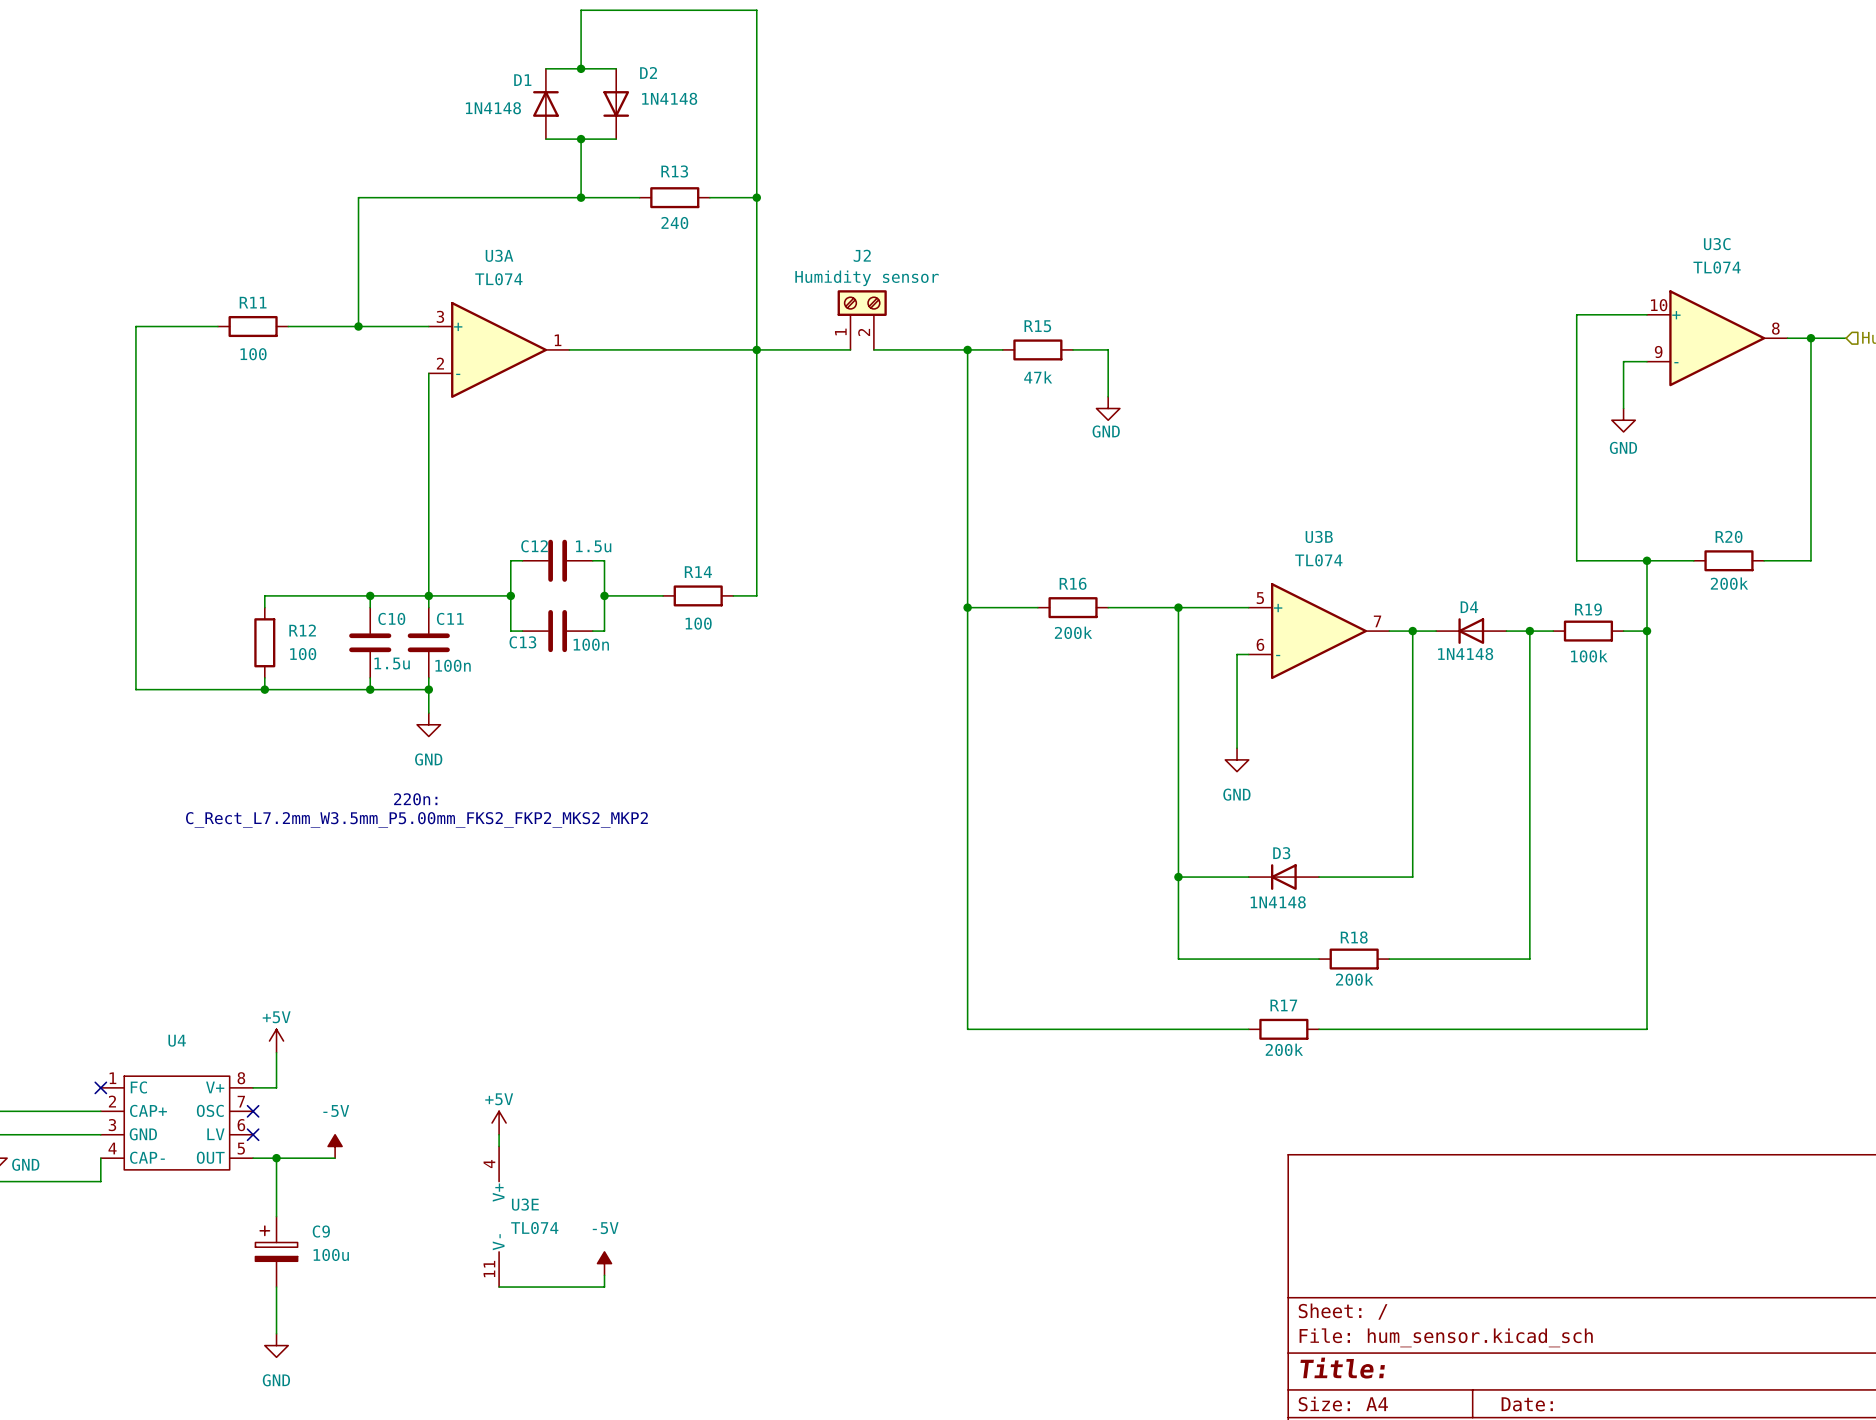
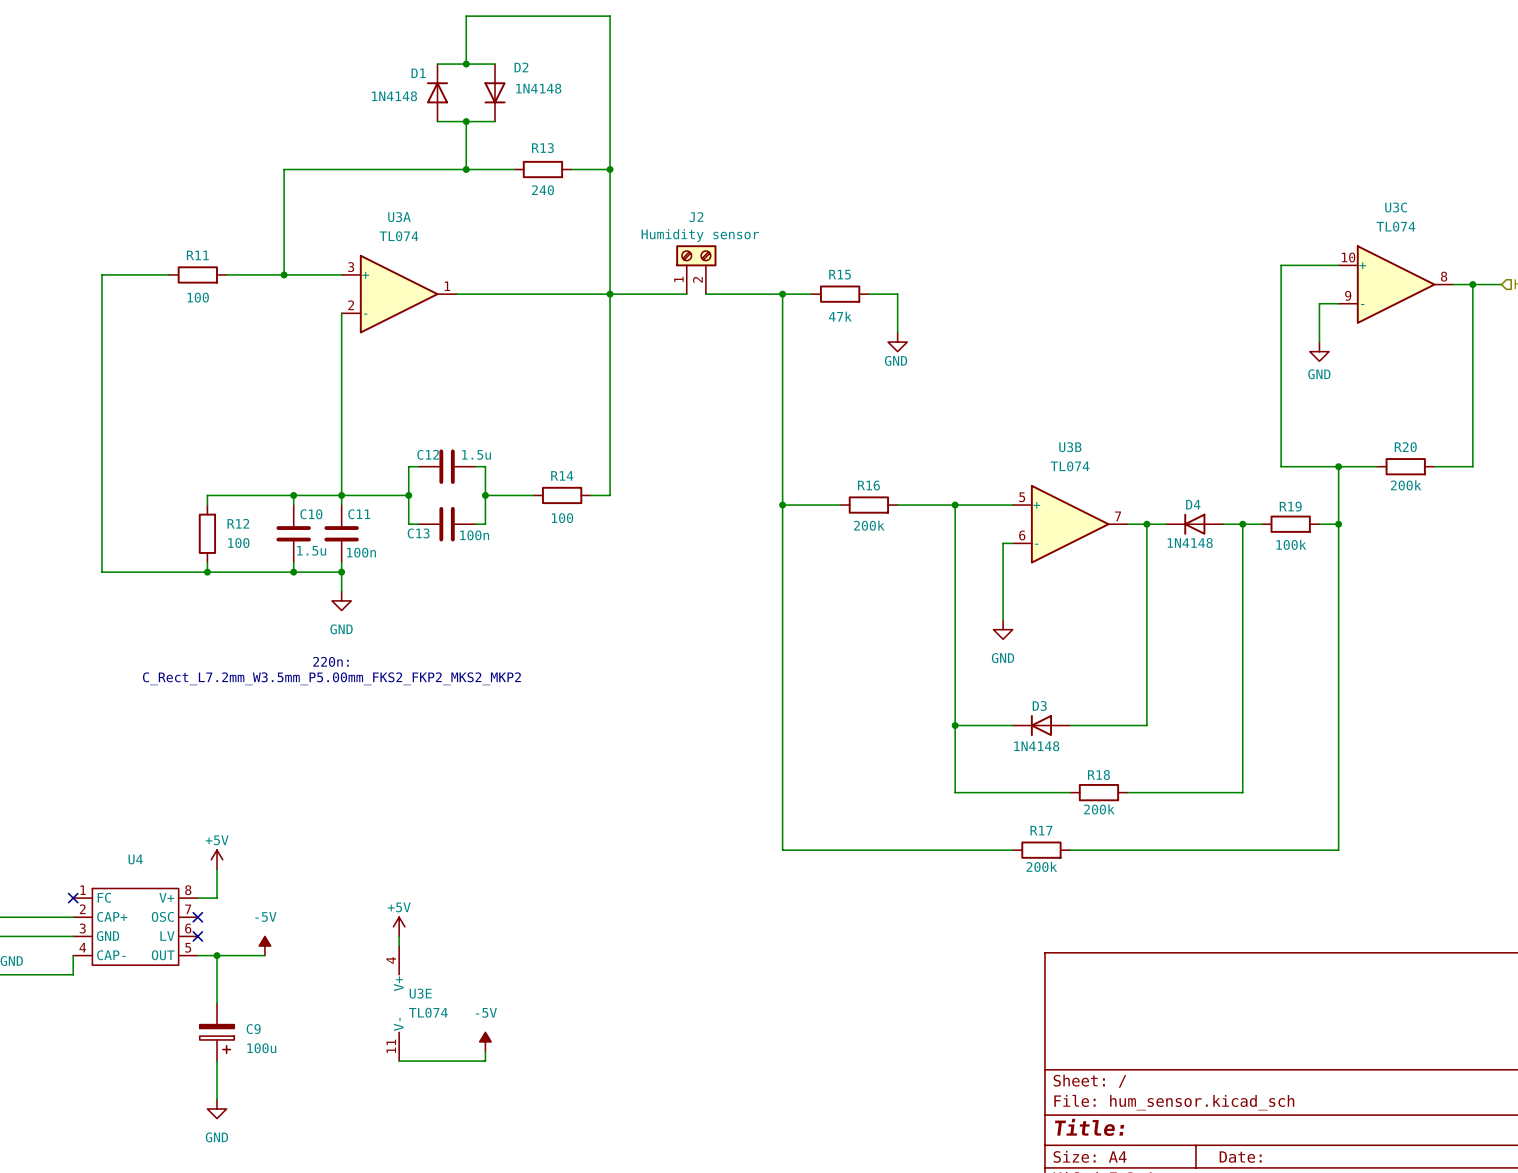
C9 rotation: 0° (276, 1243) -> 180° (217, 1039)

